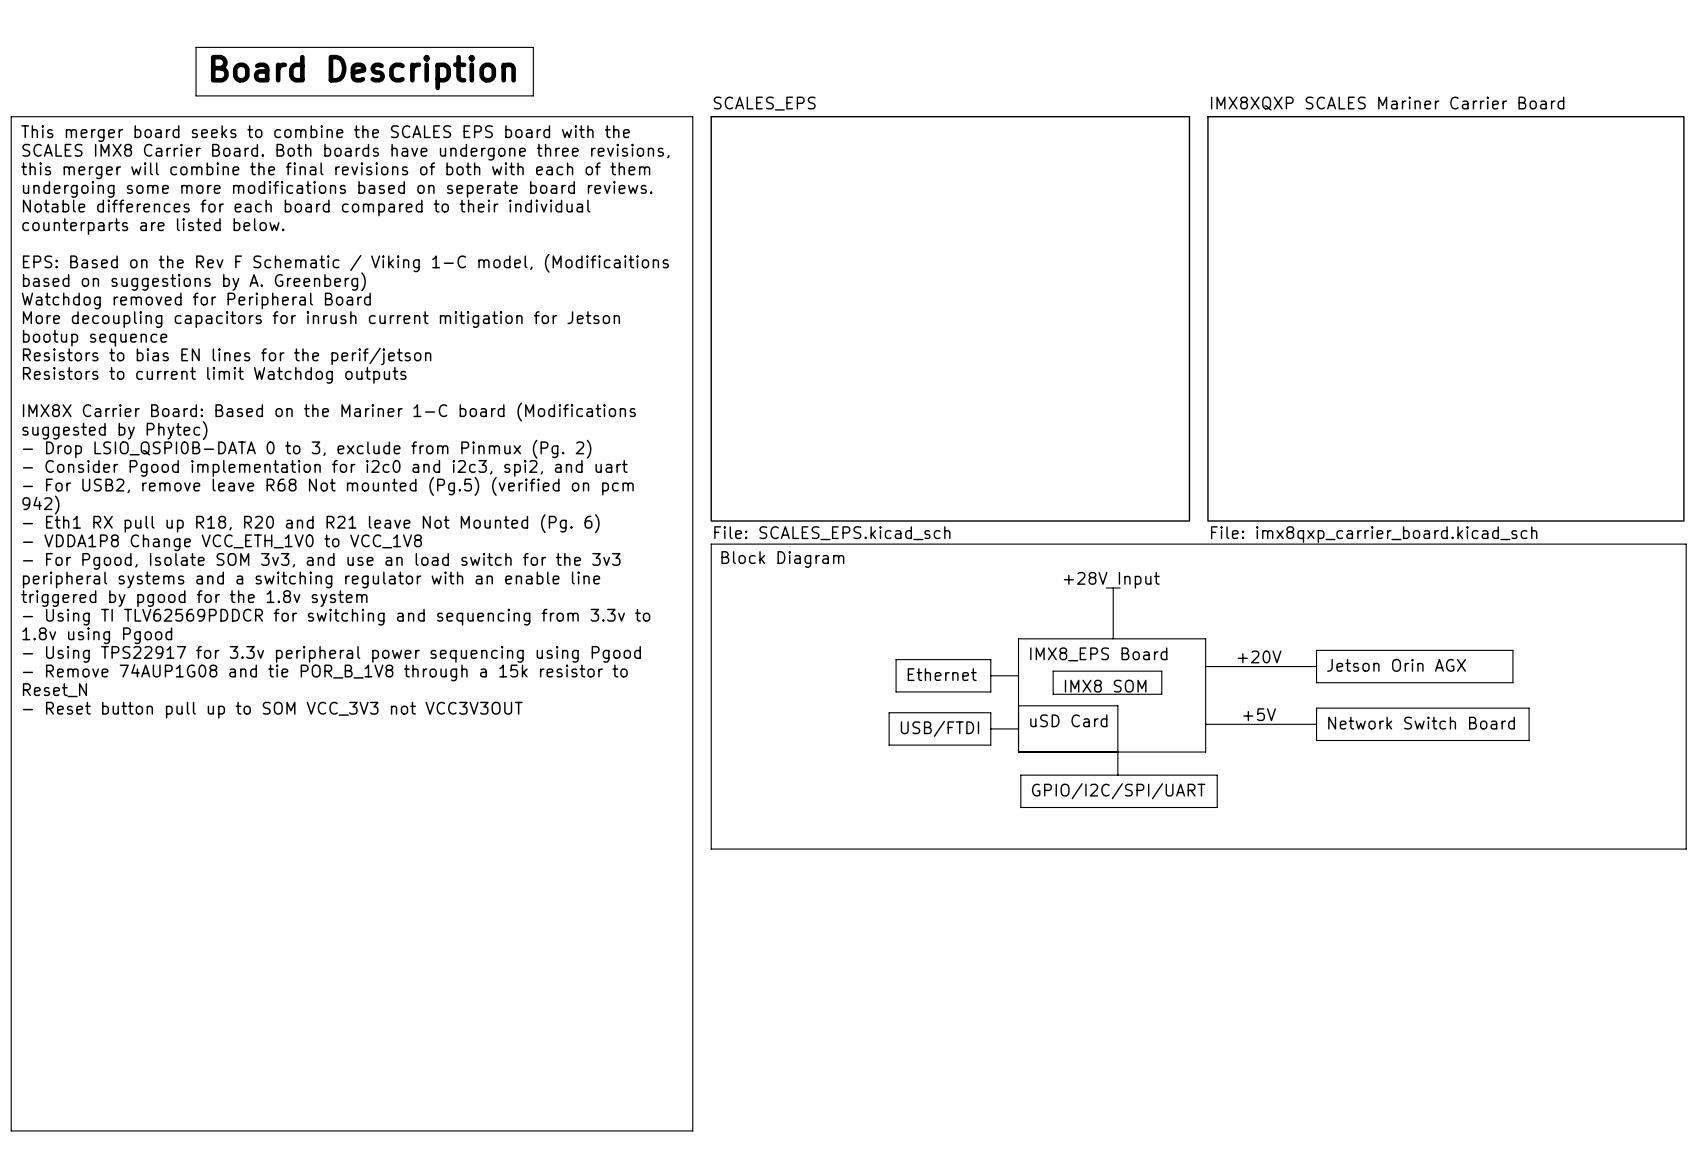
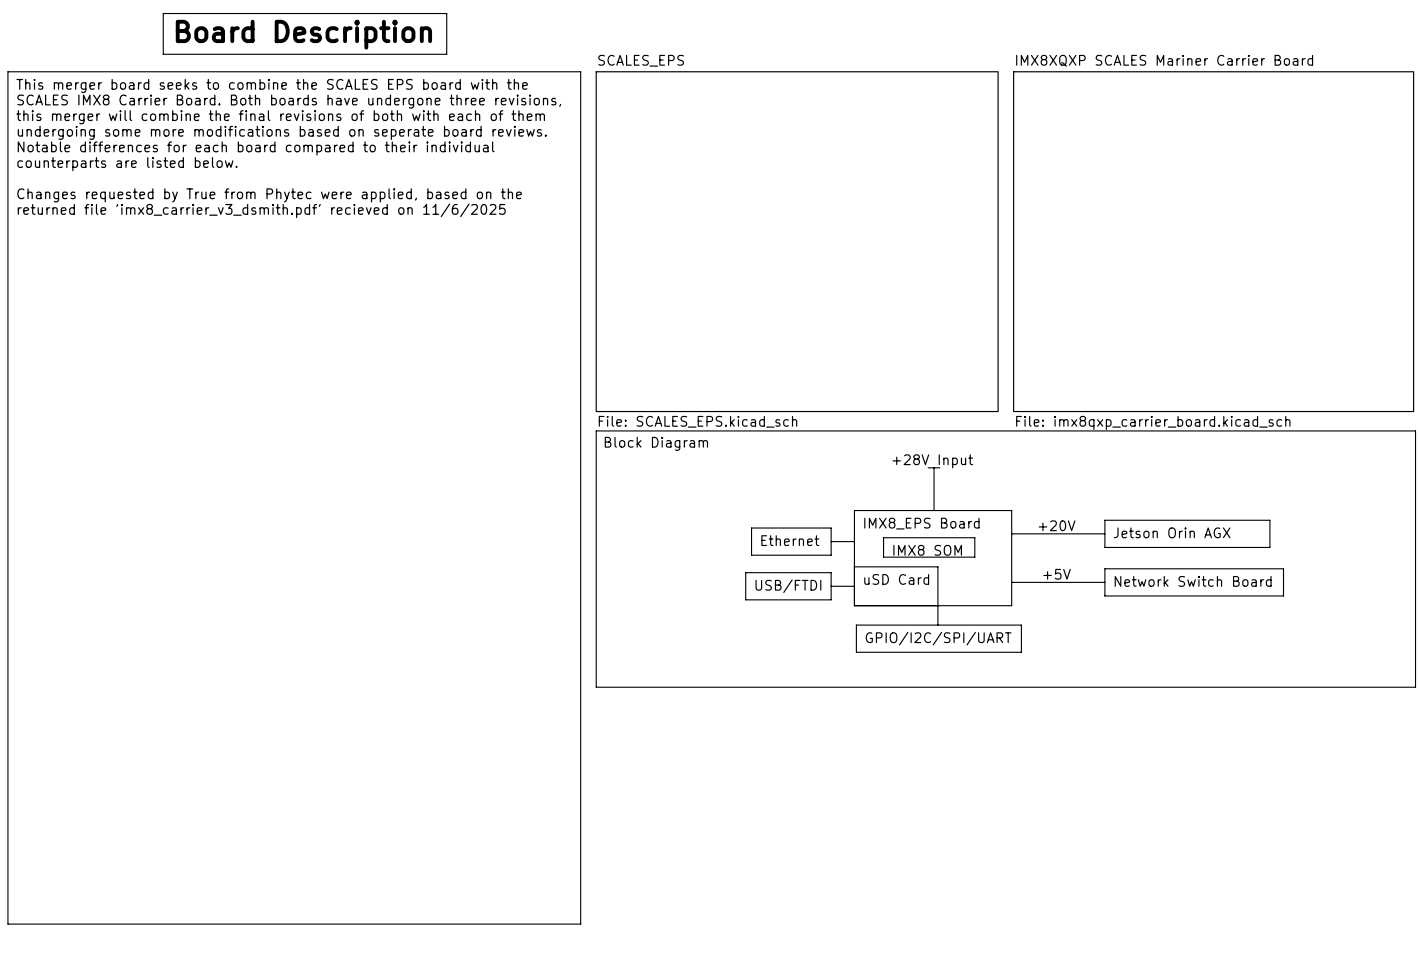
text: EPS: Based on the Rev F Schematic / Viking 1-C model, (Modificaitions (345, 263) -> Changes requested by True from Phytec were applied, based on the (269, 195)
text: based on suggestions by A. Greenberg) (194, 281) -> returned file 'imx8_carrier_v3_dsmith.pdf' recieved on 11/6/2025 (261, 210)
text: Watchdog removed for Peripheral Board (196, 300) -> none
text: More decoupling capacitors for inrush current mitigation for Jetson (321, 319) -> none
text: bootup sequence (95, 338) -> none
text: Resistors to bias EN lines for the perif/jetson (227, 356) -> none
text: Resistors to current limit Watchdog outputs (214, 375) -> none
text: IMX8X Carrier Board: Based on the Mariner 1-C board (Modifications (329, 412) -> none
text: suggested by Phytec) (114, 430) -> none
text: - Drop LSIO_QSPI0B-DATA 0 to 3, exclude from Pinmux (Pg. 2) (307, 449) -> none
text: - Consider Pgood implementation for i2c0 and i2c3, spi2, and uart (325, 468) -> none
text: - For USB2, remove leave R68 Not mounted (Pg.5) (verified on pcm (328, 486) -> none
text: 942) (40, 505) -> none
text: - Eth1 RX pull up R18, R20 and R21 leave Not Mounted (Pg. 6) (311, 523) -> none
text: - VDDA1P8 Change VCC_ETH_1V0 to VCC_1V8 (222, 542) -> none
text: - For Pgood, Isolate SOM 3v3, and use an load switch for the 3v3 (321, 561) -> none
text: peripheral systems and a switching regulator with an enable line (311, 579) -> none
text: triggered by pgood for the 1.8v system (194, 598) -> none
text: - Using TI TLV62569PDDCR for switching and sequencing from 3.3v to (336, 617) -> none
text: 1.8v using Pgood (97, 635) -> none
text: - Using TPS22917 for 3.3v peripheral power sequencing using Pgood (331, 654) -> none
text: - Remove 74AUP1G08 and tie POR_B_1V8 through a 15k resistor to (325, 672) -> none
text: Reset_N (54, 690) -> none
text: - Reset button pull up to SOM VCC_3V3 not VCC3V3OUT (272, 710) -> none

